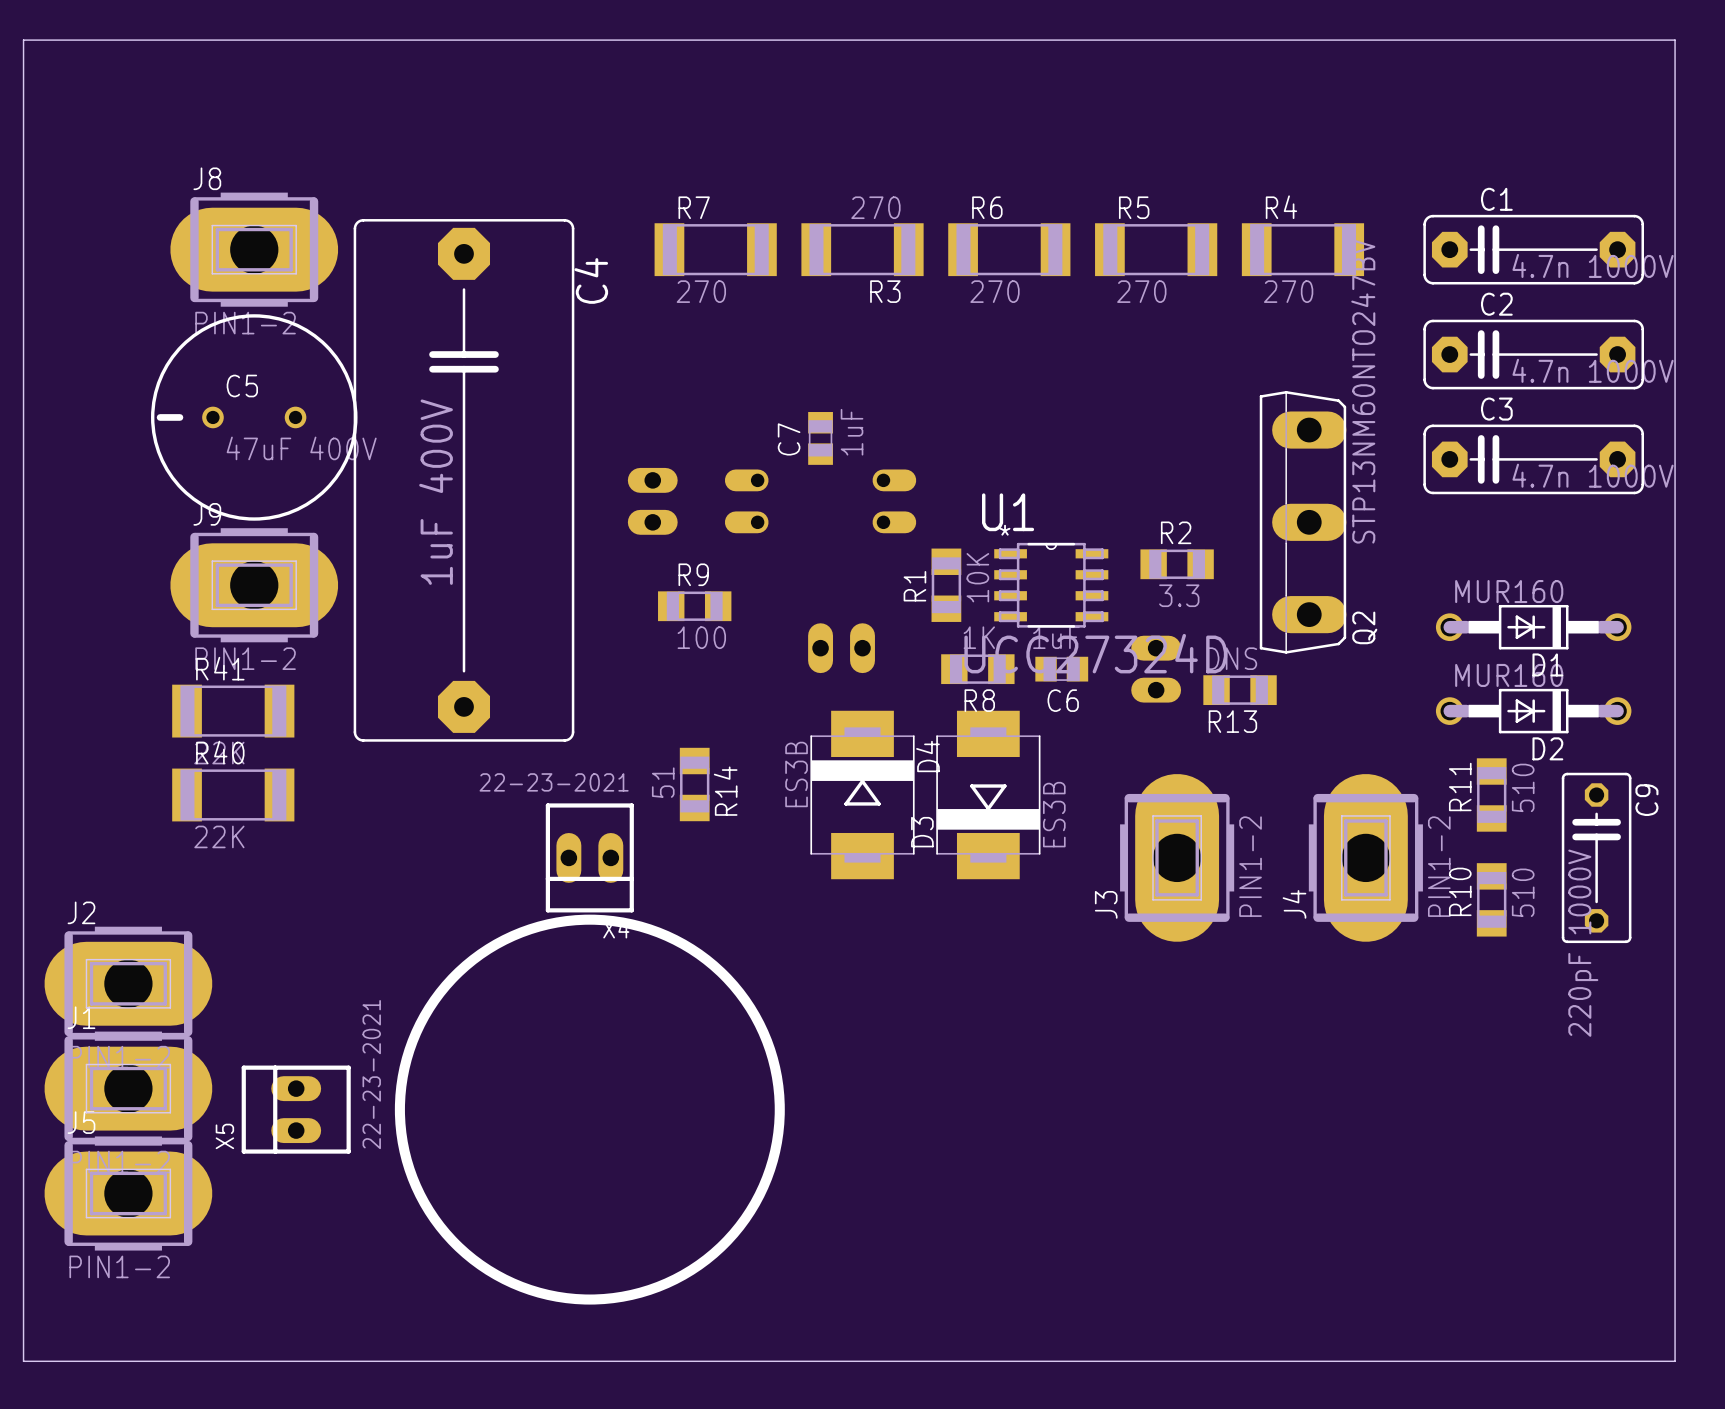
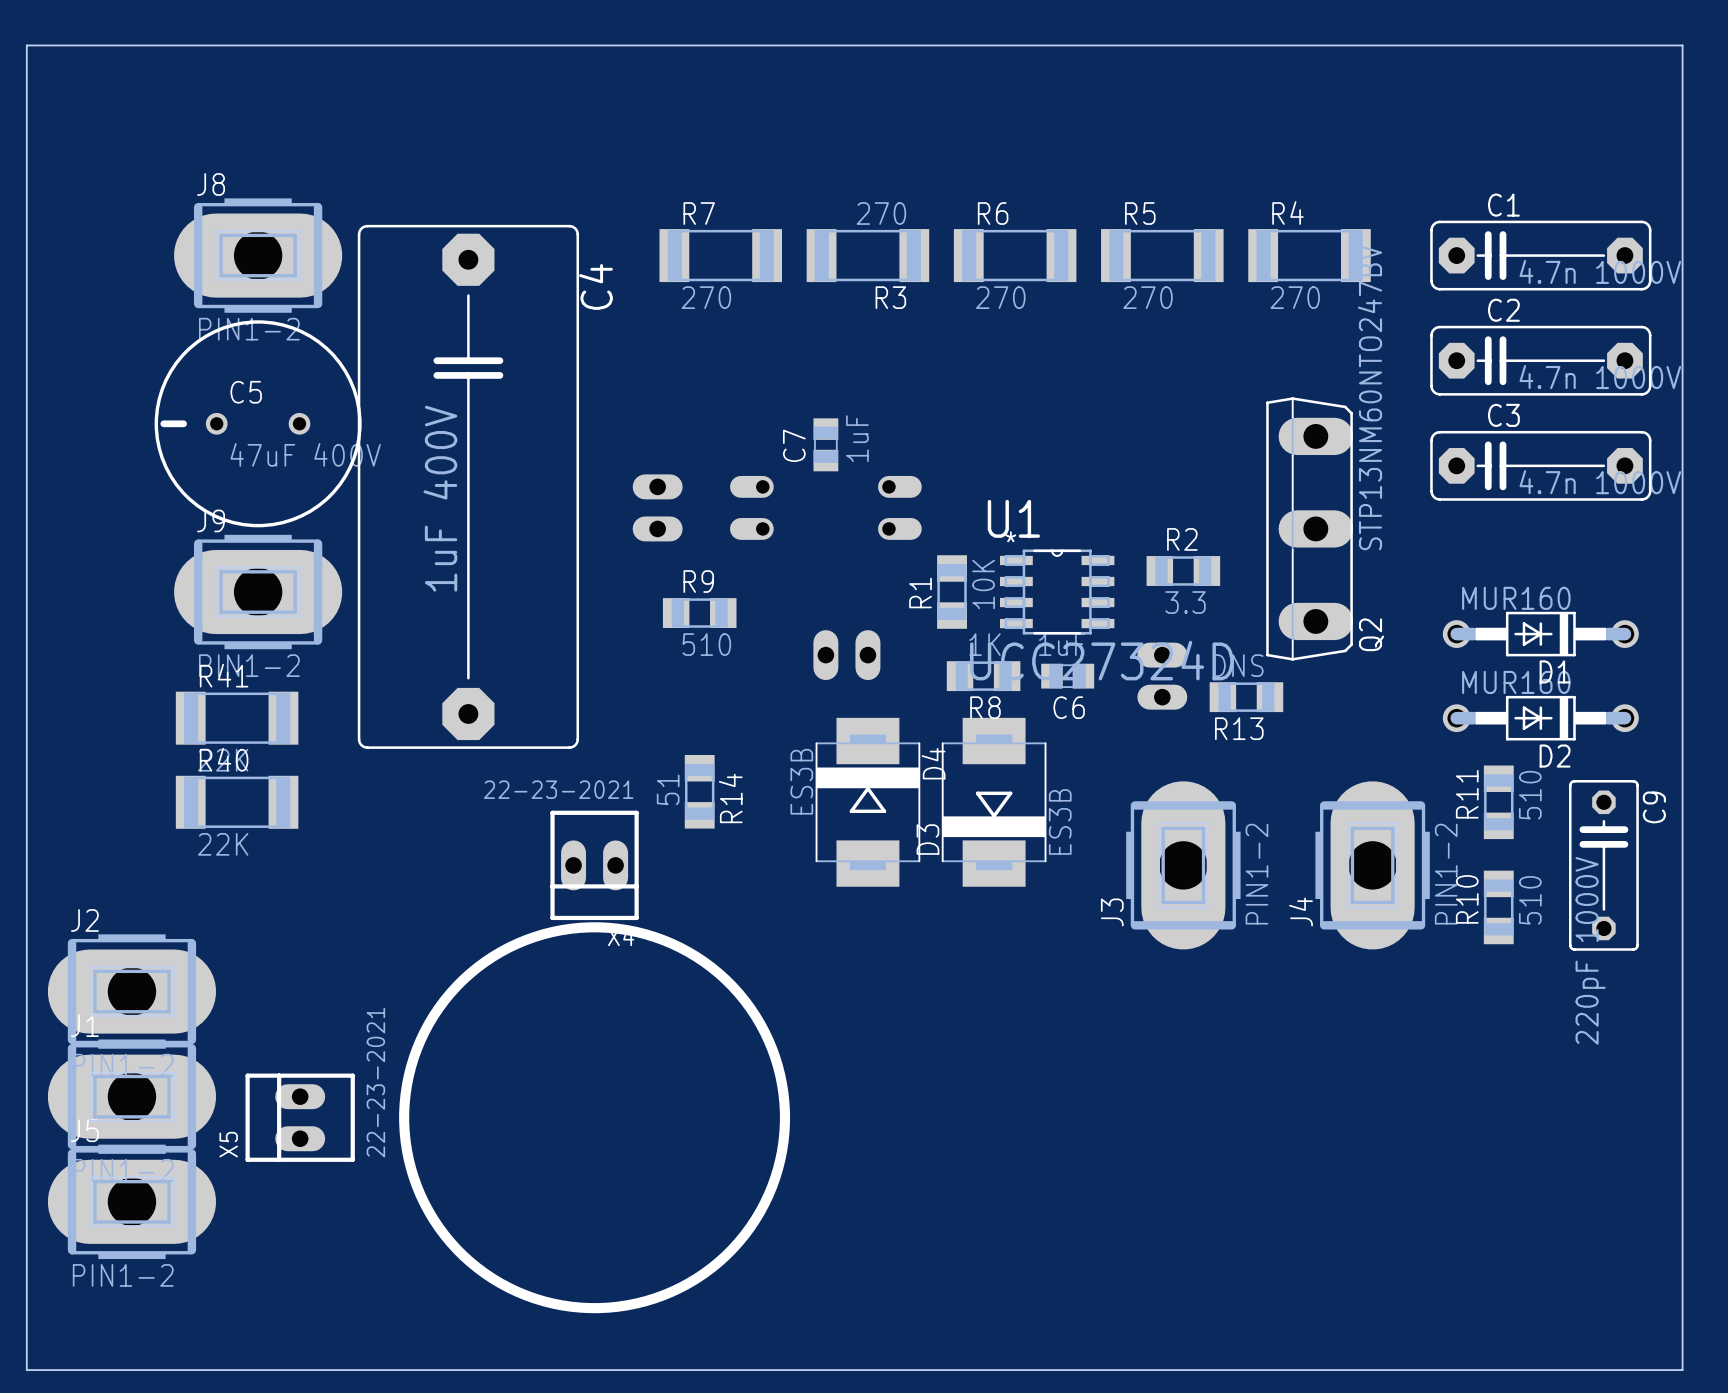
R9 value: 100 (701, 637) -> 510 (706, 644)

